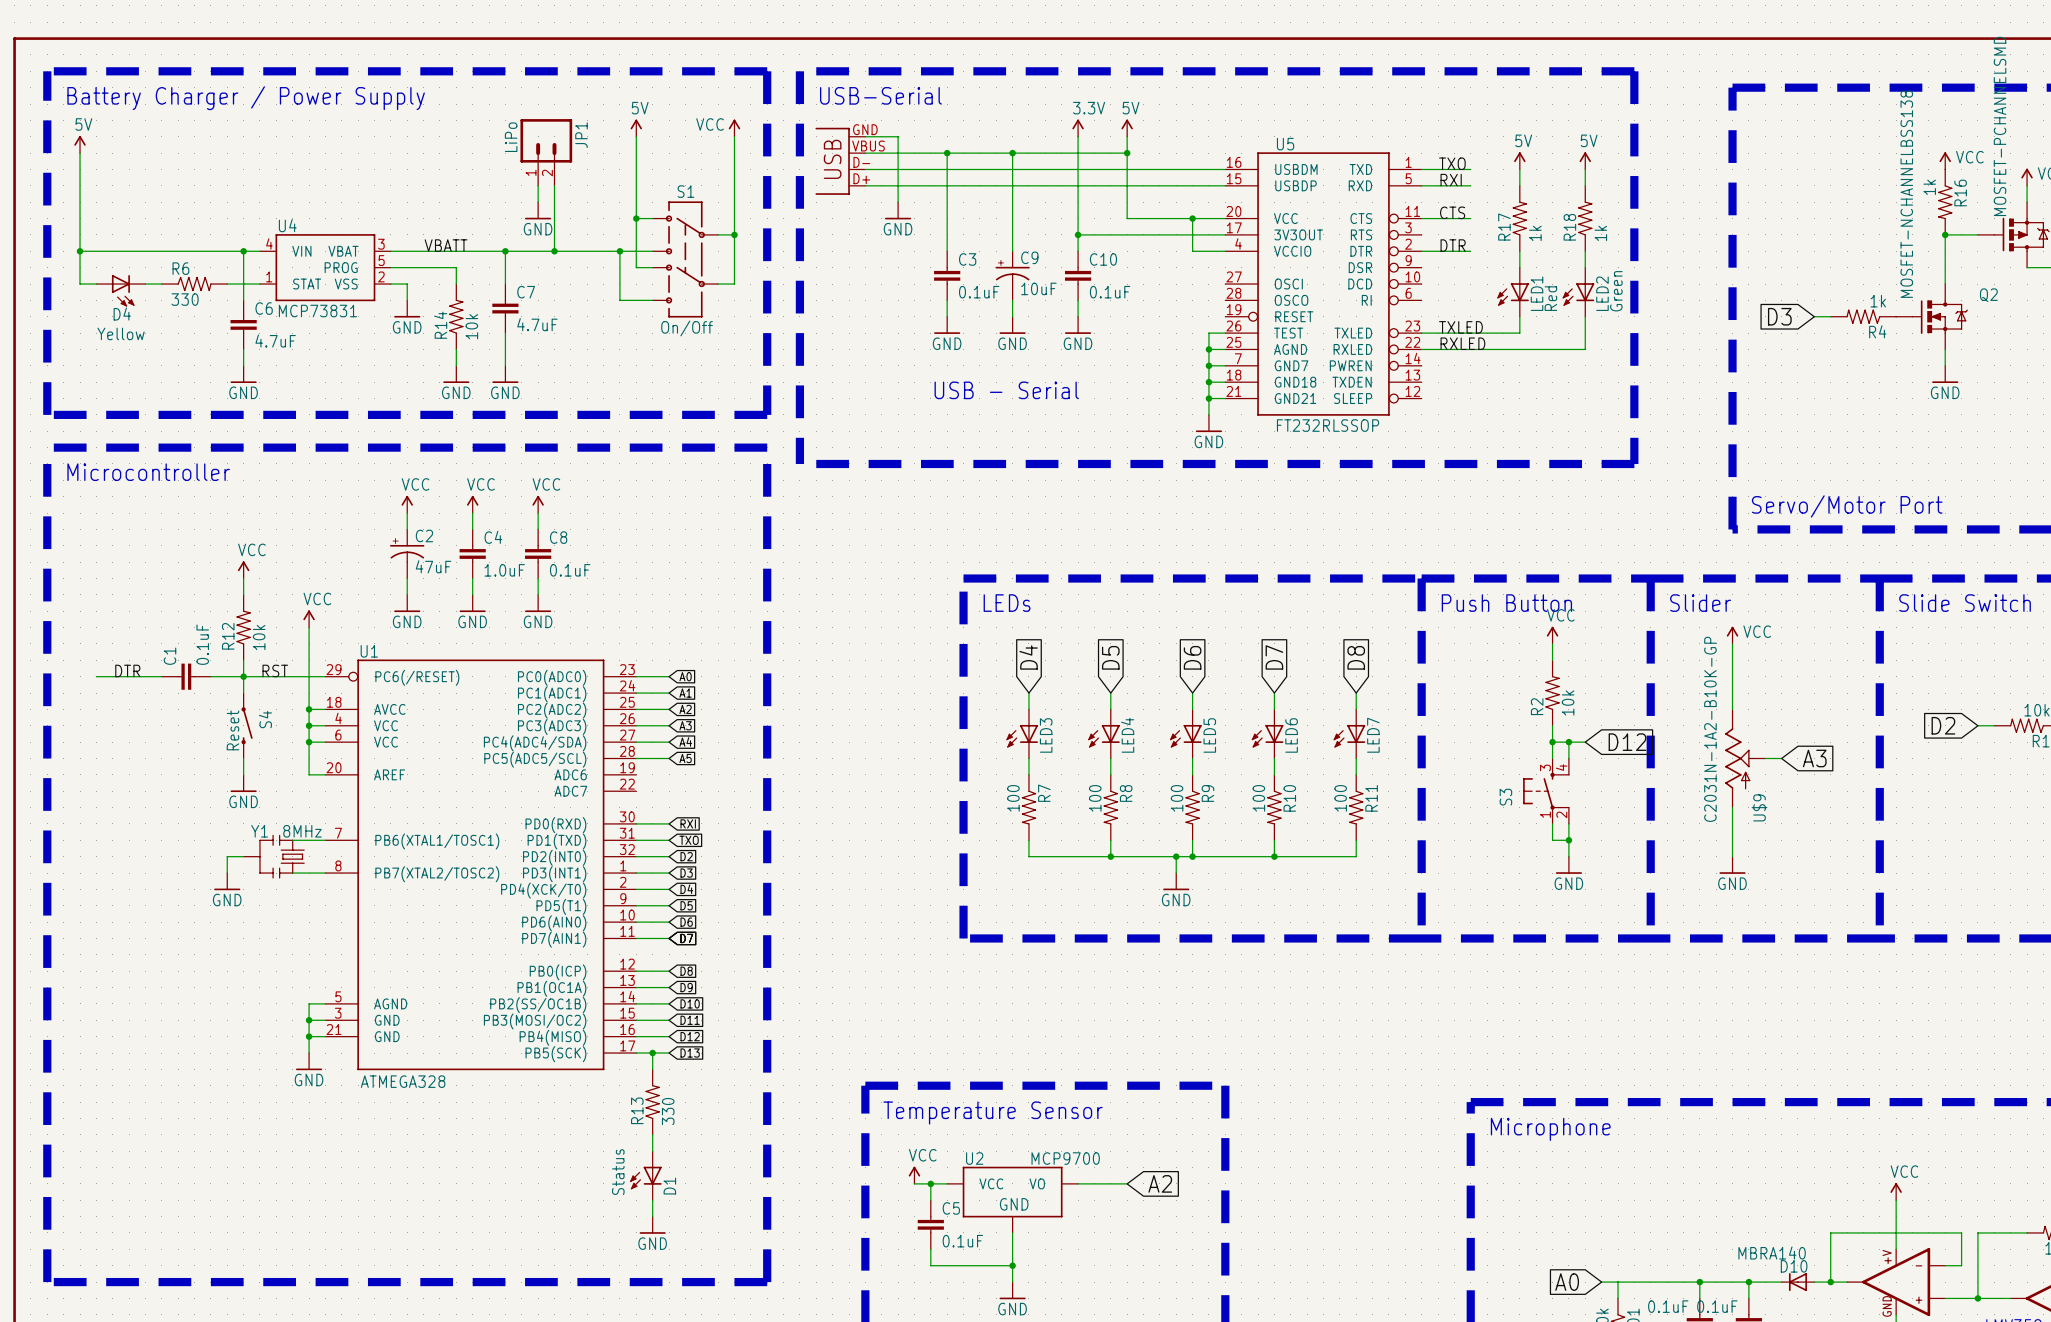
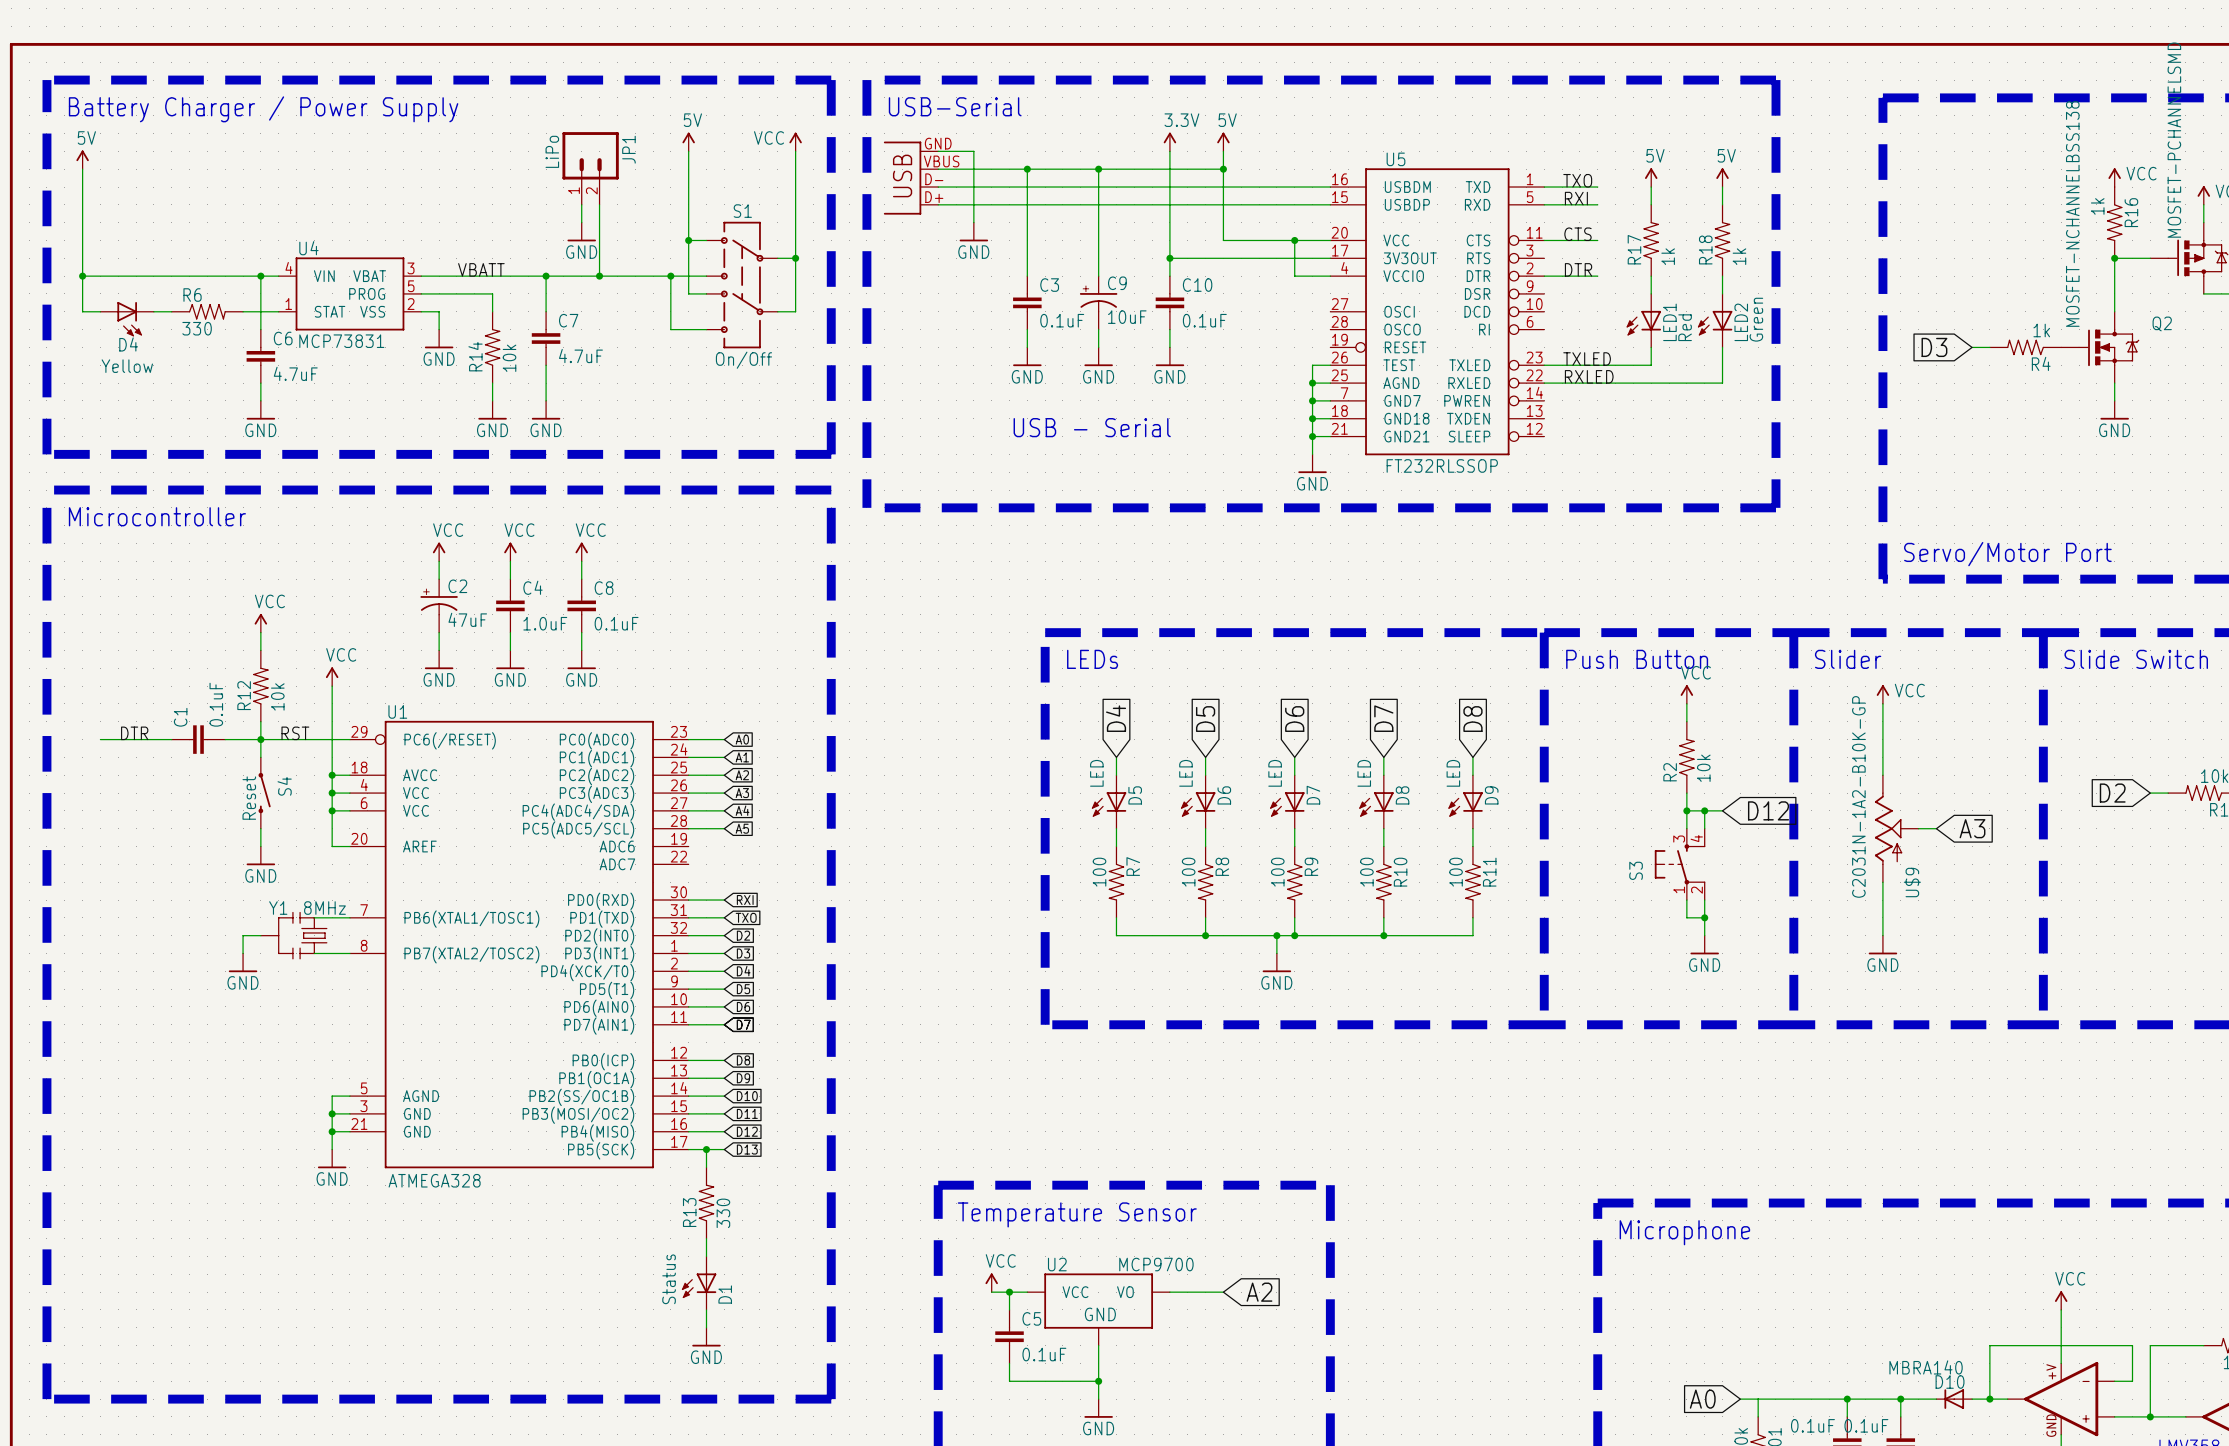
LED3 value: none -> LED (1096, 773)
LED4 value: none -> LED (1185, 773)
LED5 value: none -> LED (1275, 773)
LED6 value: none -> LED (1364, 773)
LED7 value: none -> LED (1453, 773)
LED3 name: LED3 (1046, 735) -> D5 (1135, 795)
LED4 name: LED4 (1127, 735) -> D6 (1224, 795)
LED5 name: LED5 (1209, 735) -> D7 (1313, 795)
LED6 name: LED6 (1291, 735) -> D8 (1402, 795)
LED7 name: LED7 (1373, 735) -> D9 (1491, 795)

